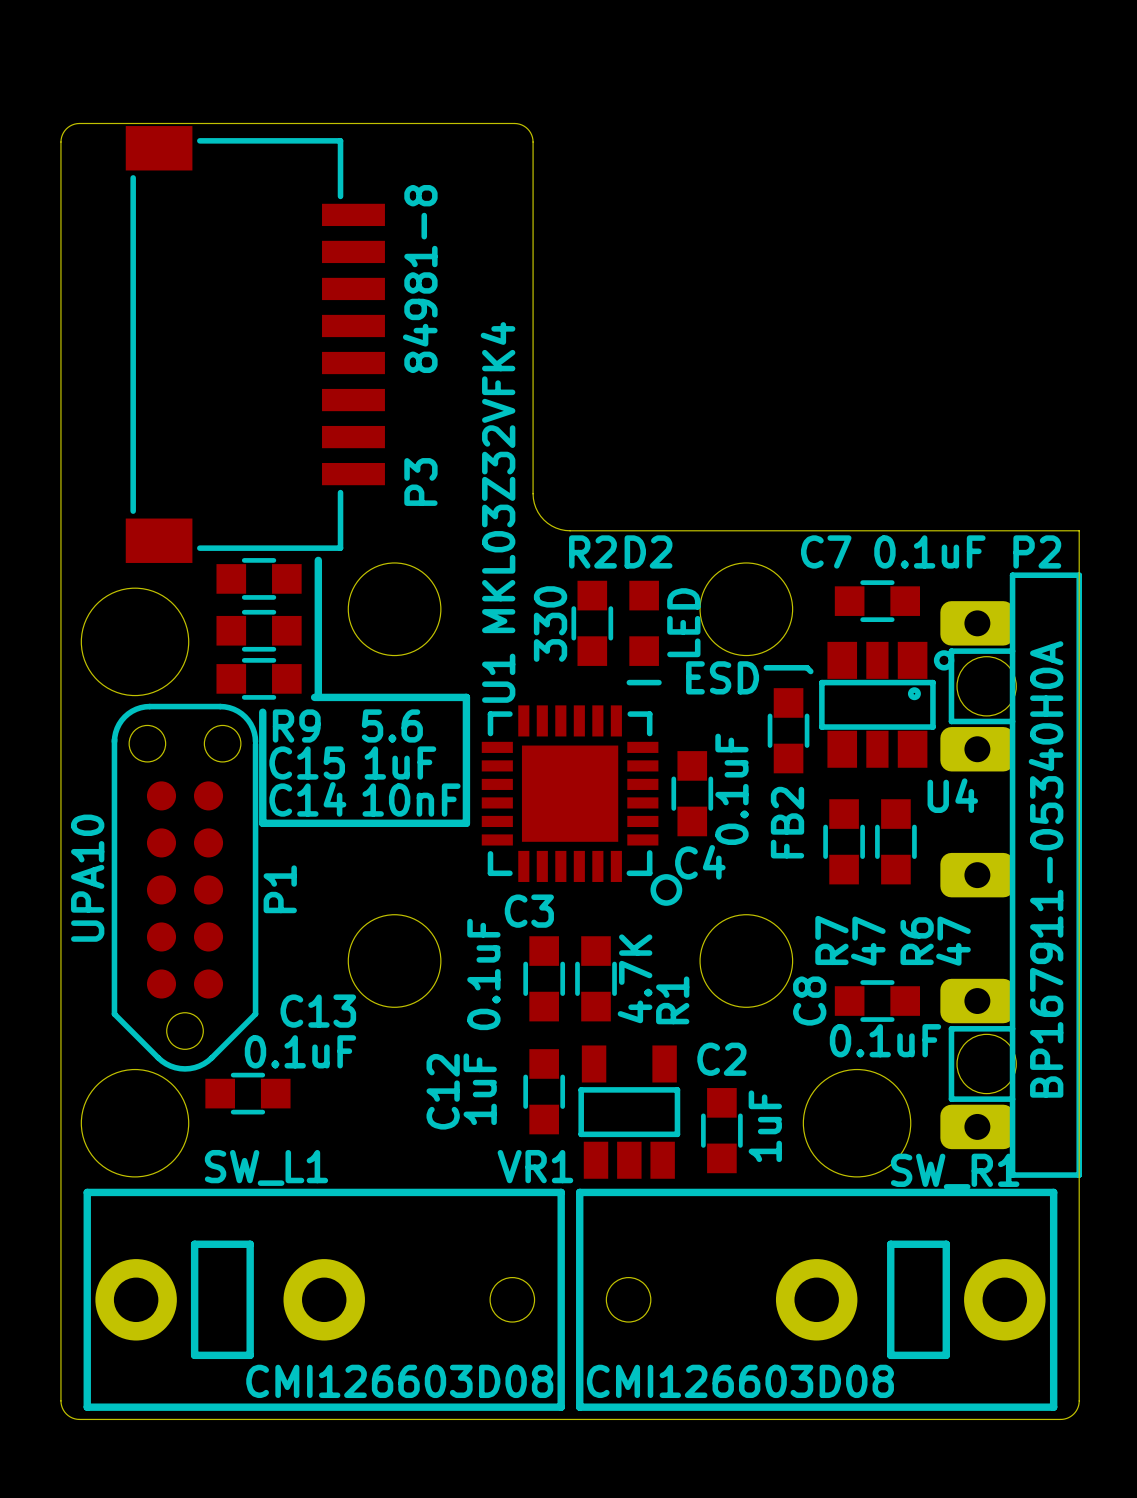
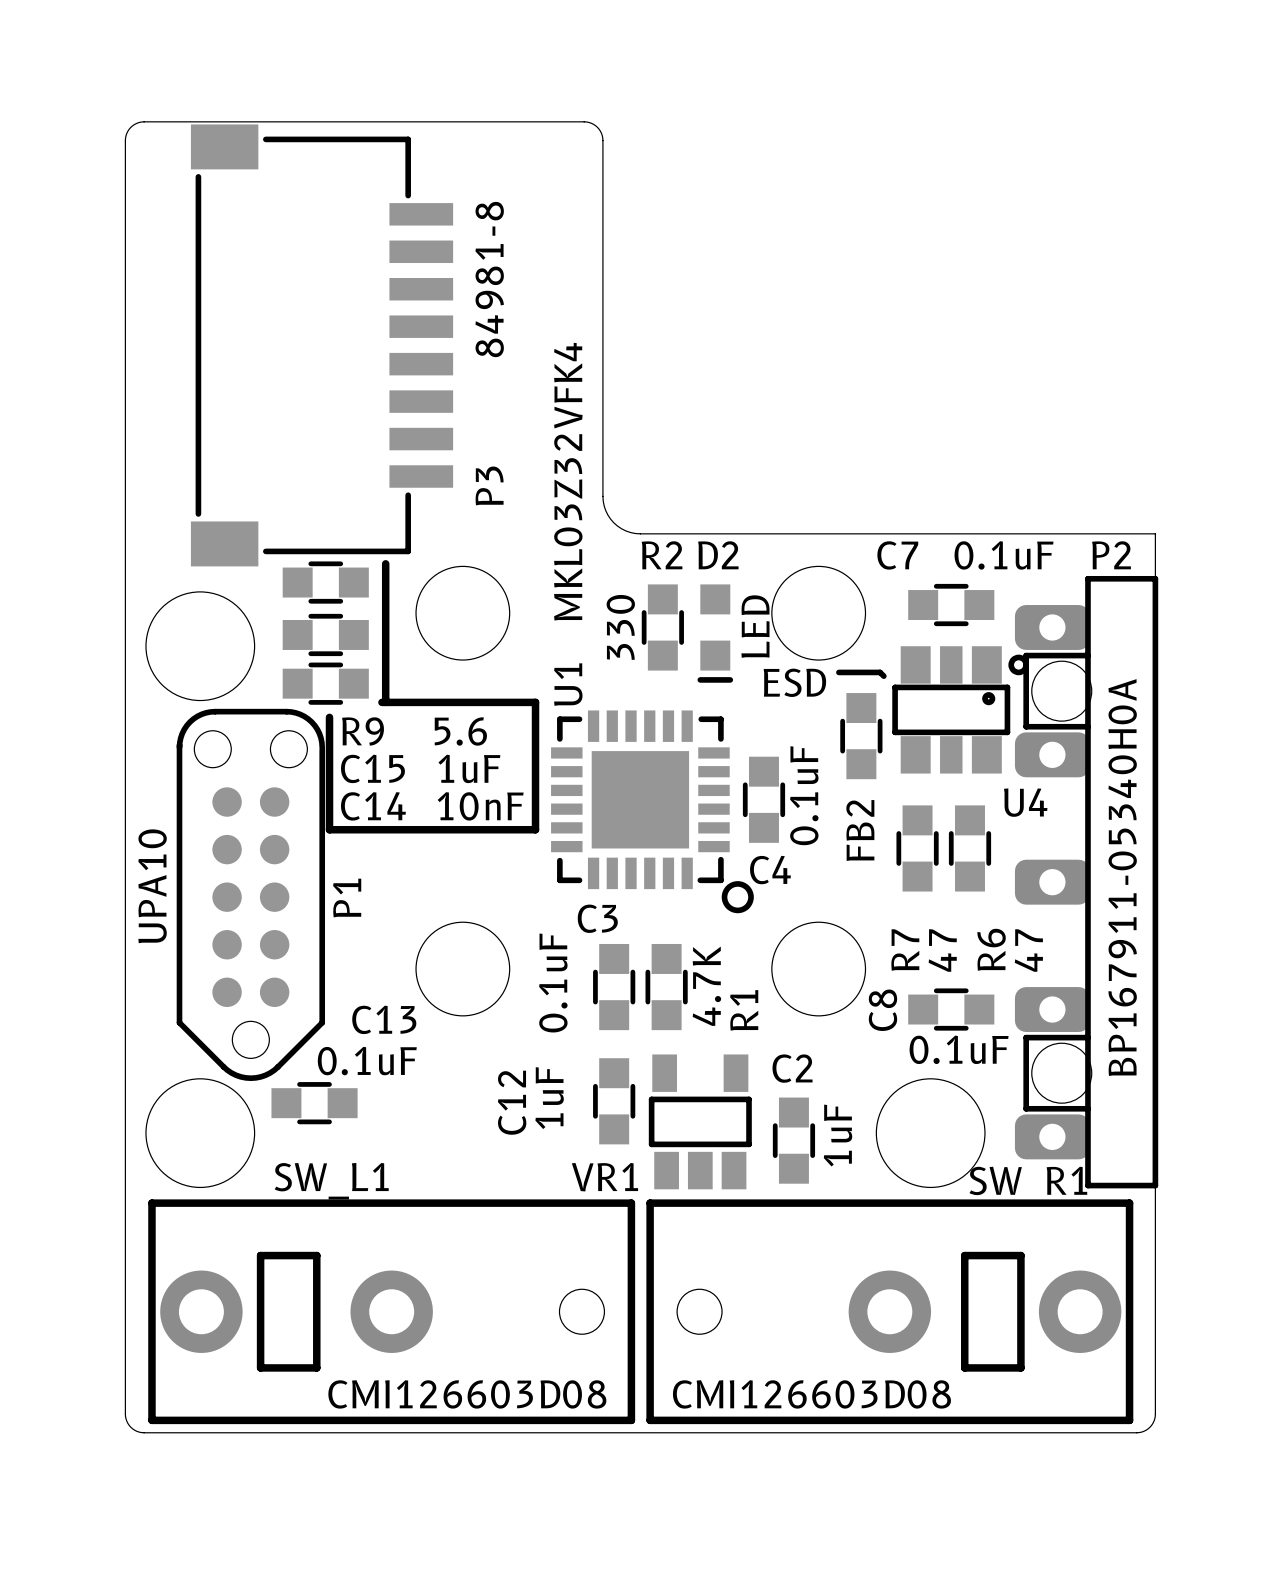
D2 footprint: [626, 580, 662, 686] -> [697, 584, 734, 683]

